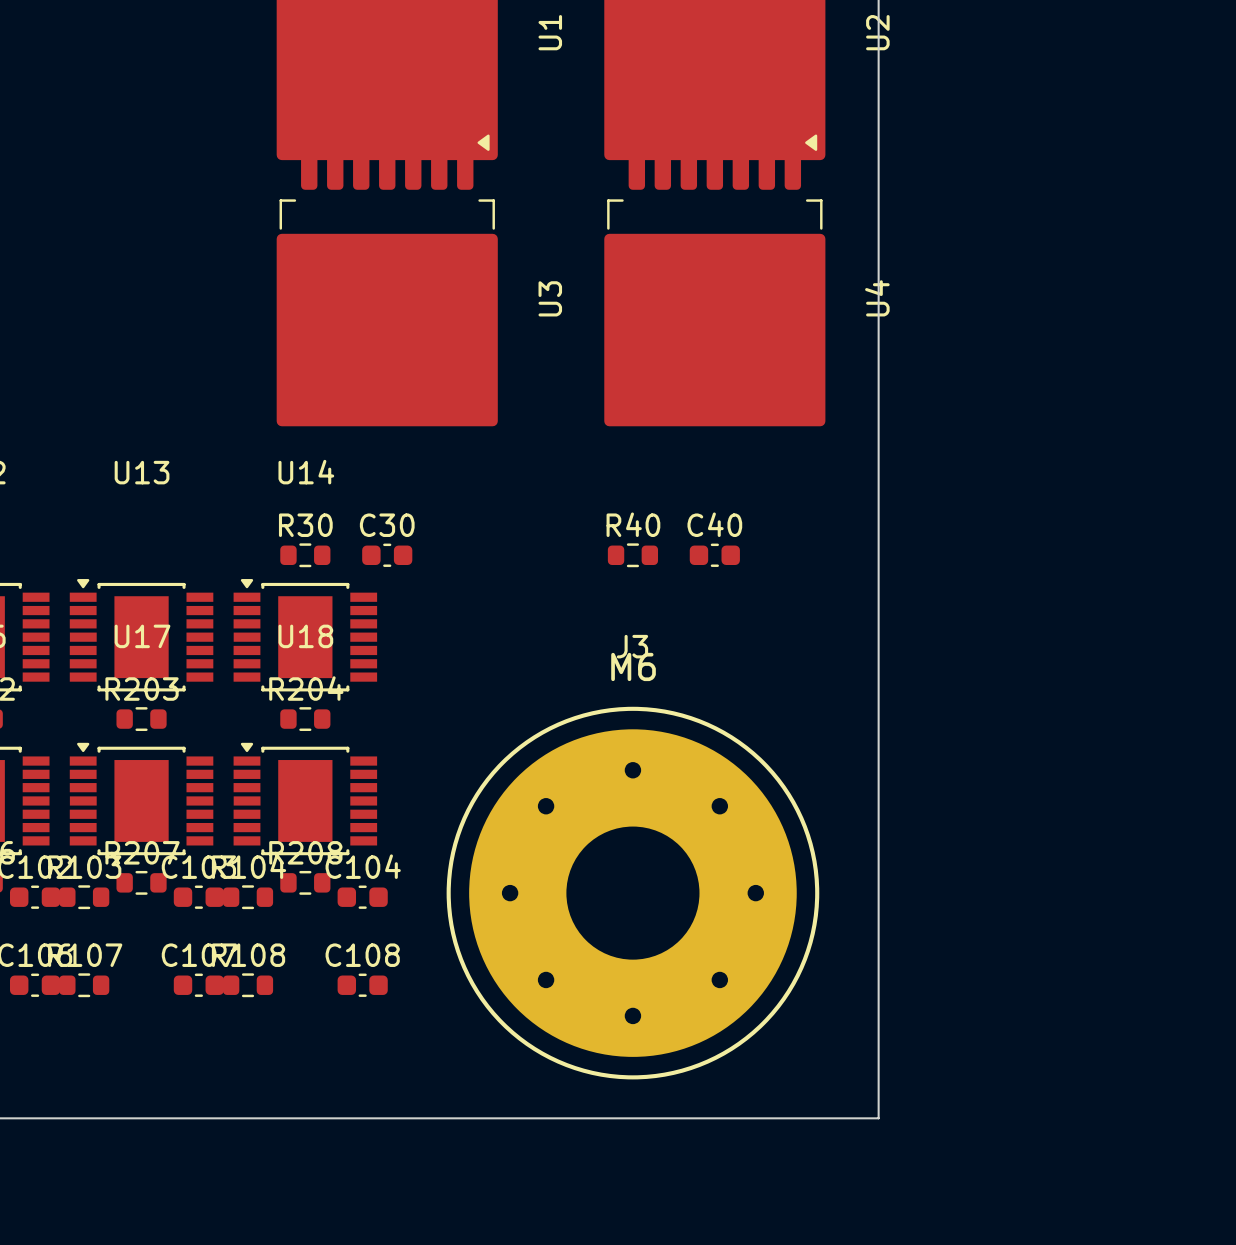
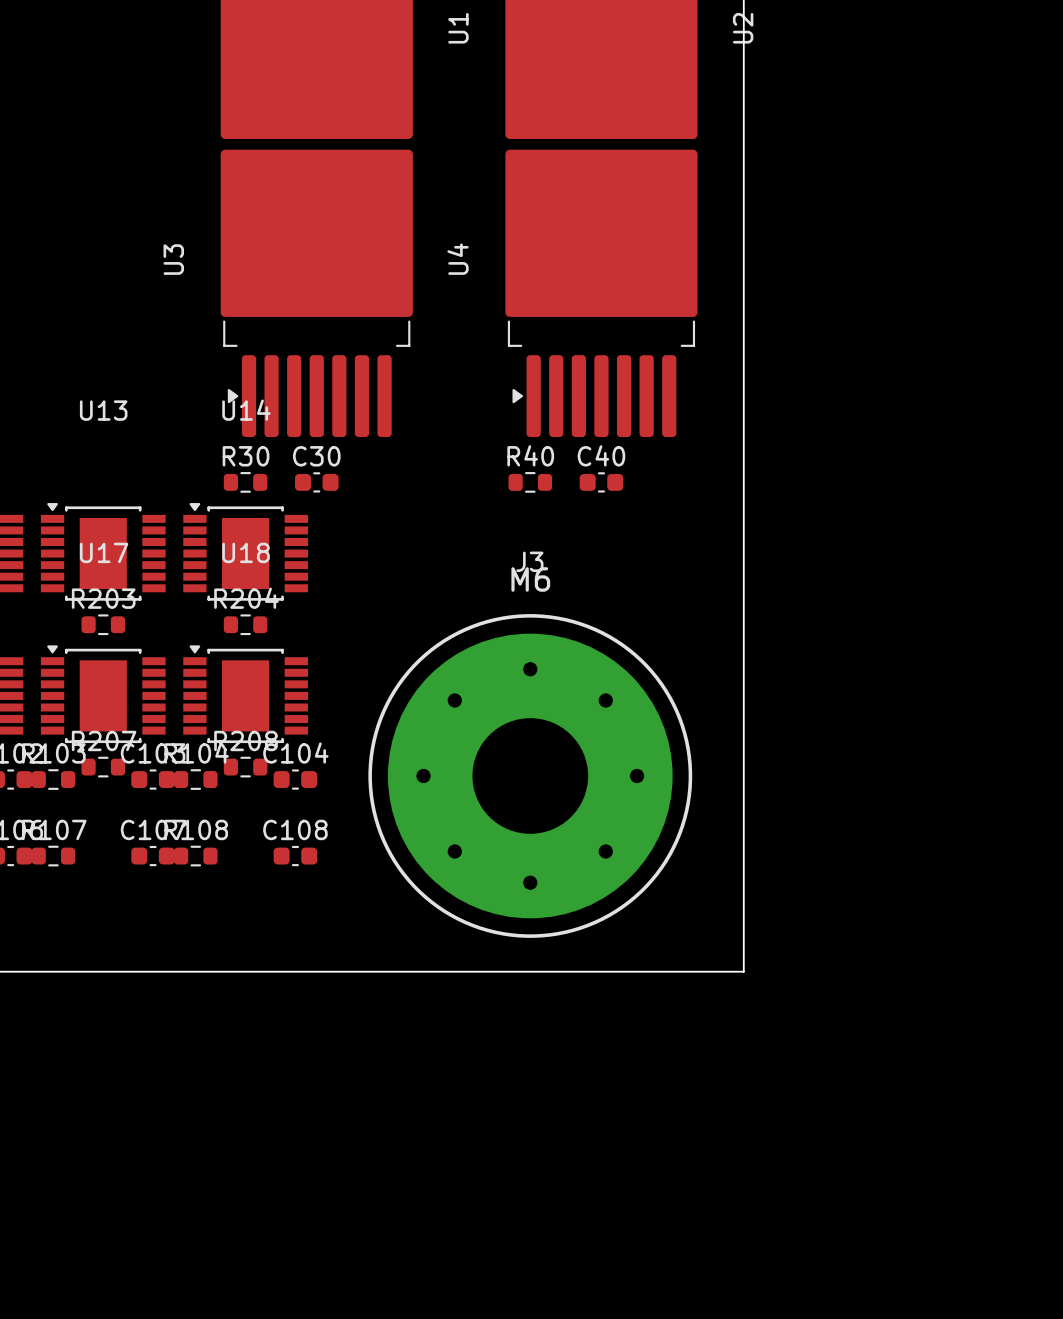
U3 rotation: 0° (387, 260) -> 180° (316, 293)
U4 rotation: 0° (714, 260) -> 180° (601, 293)

